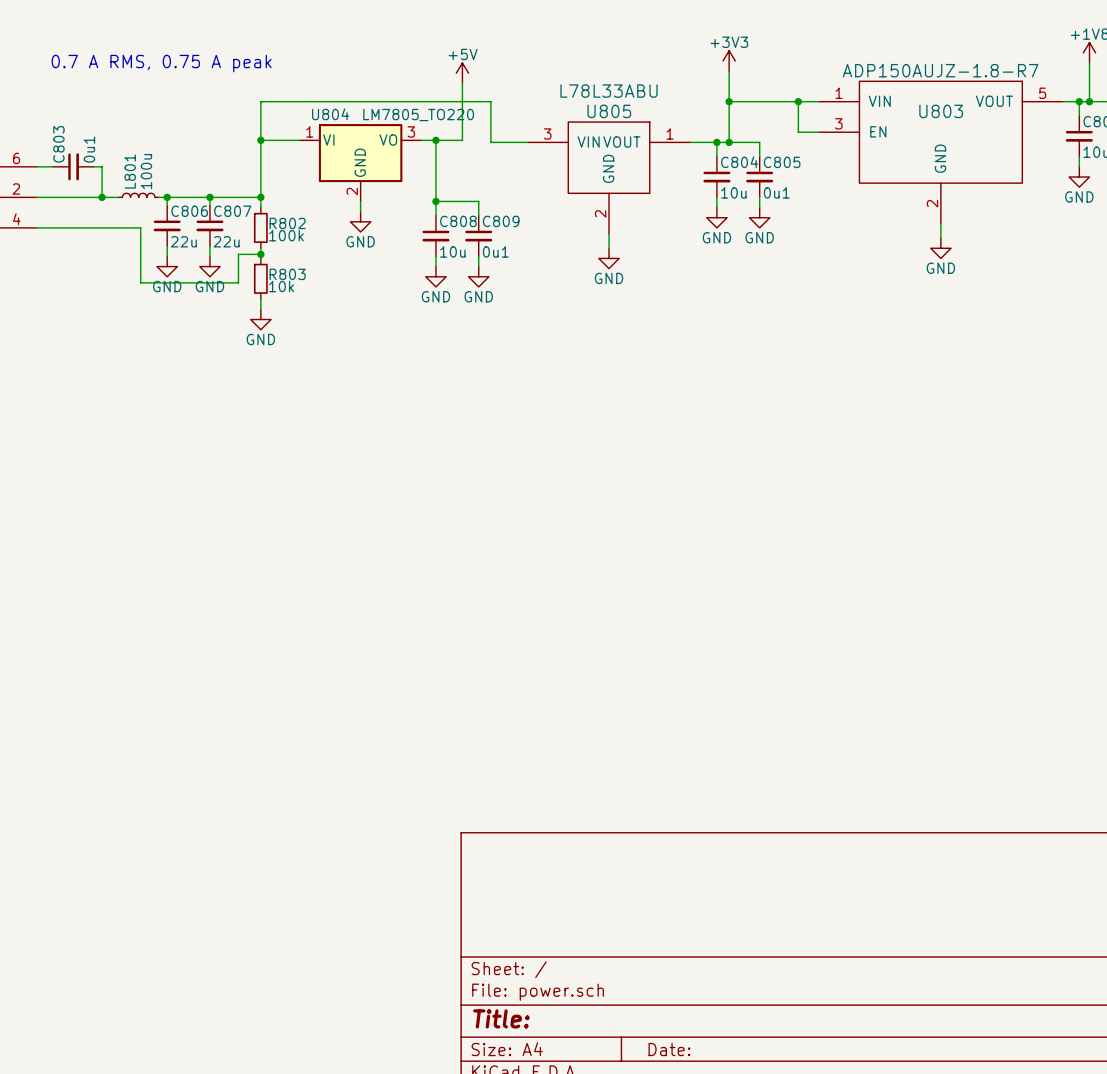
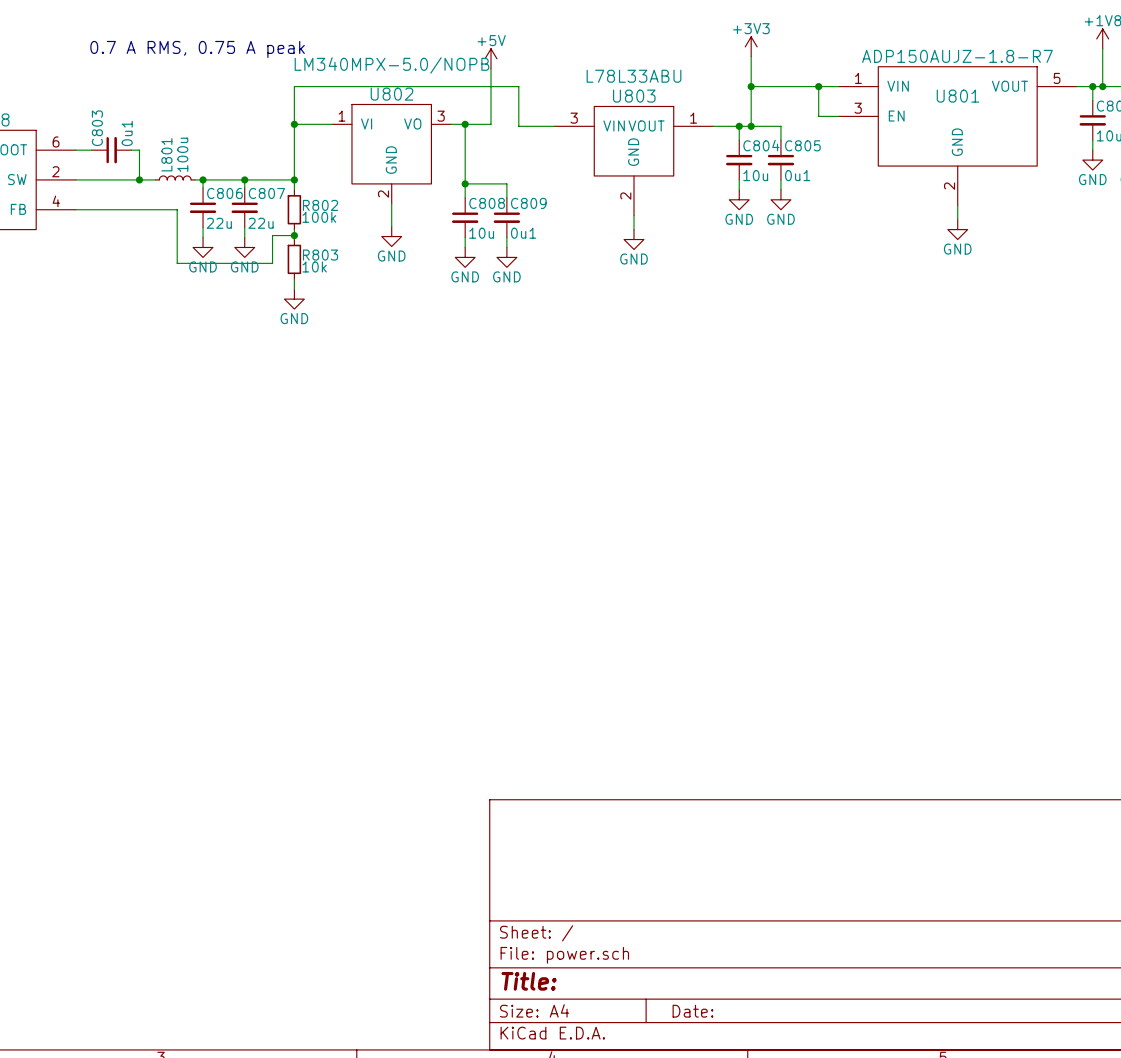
U805 name: U805 (609, 111) -> U803 (634, 96)
U803 name: U803 (941, 111) -> U801 (958, 96)
U804: LM7805_TO220 (360, 162) -> none
U802: none -> LM340MPX-5.0/NOPB (391, 154)
wire: none -> (391, 203) (391, 226)
power symbol position: GND (360, 221) -> GND (391, 236)

